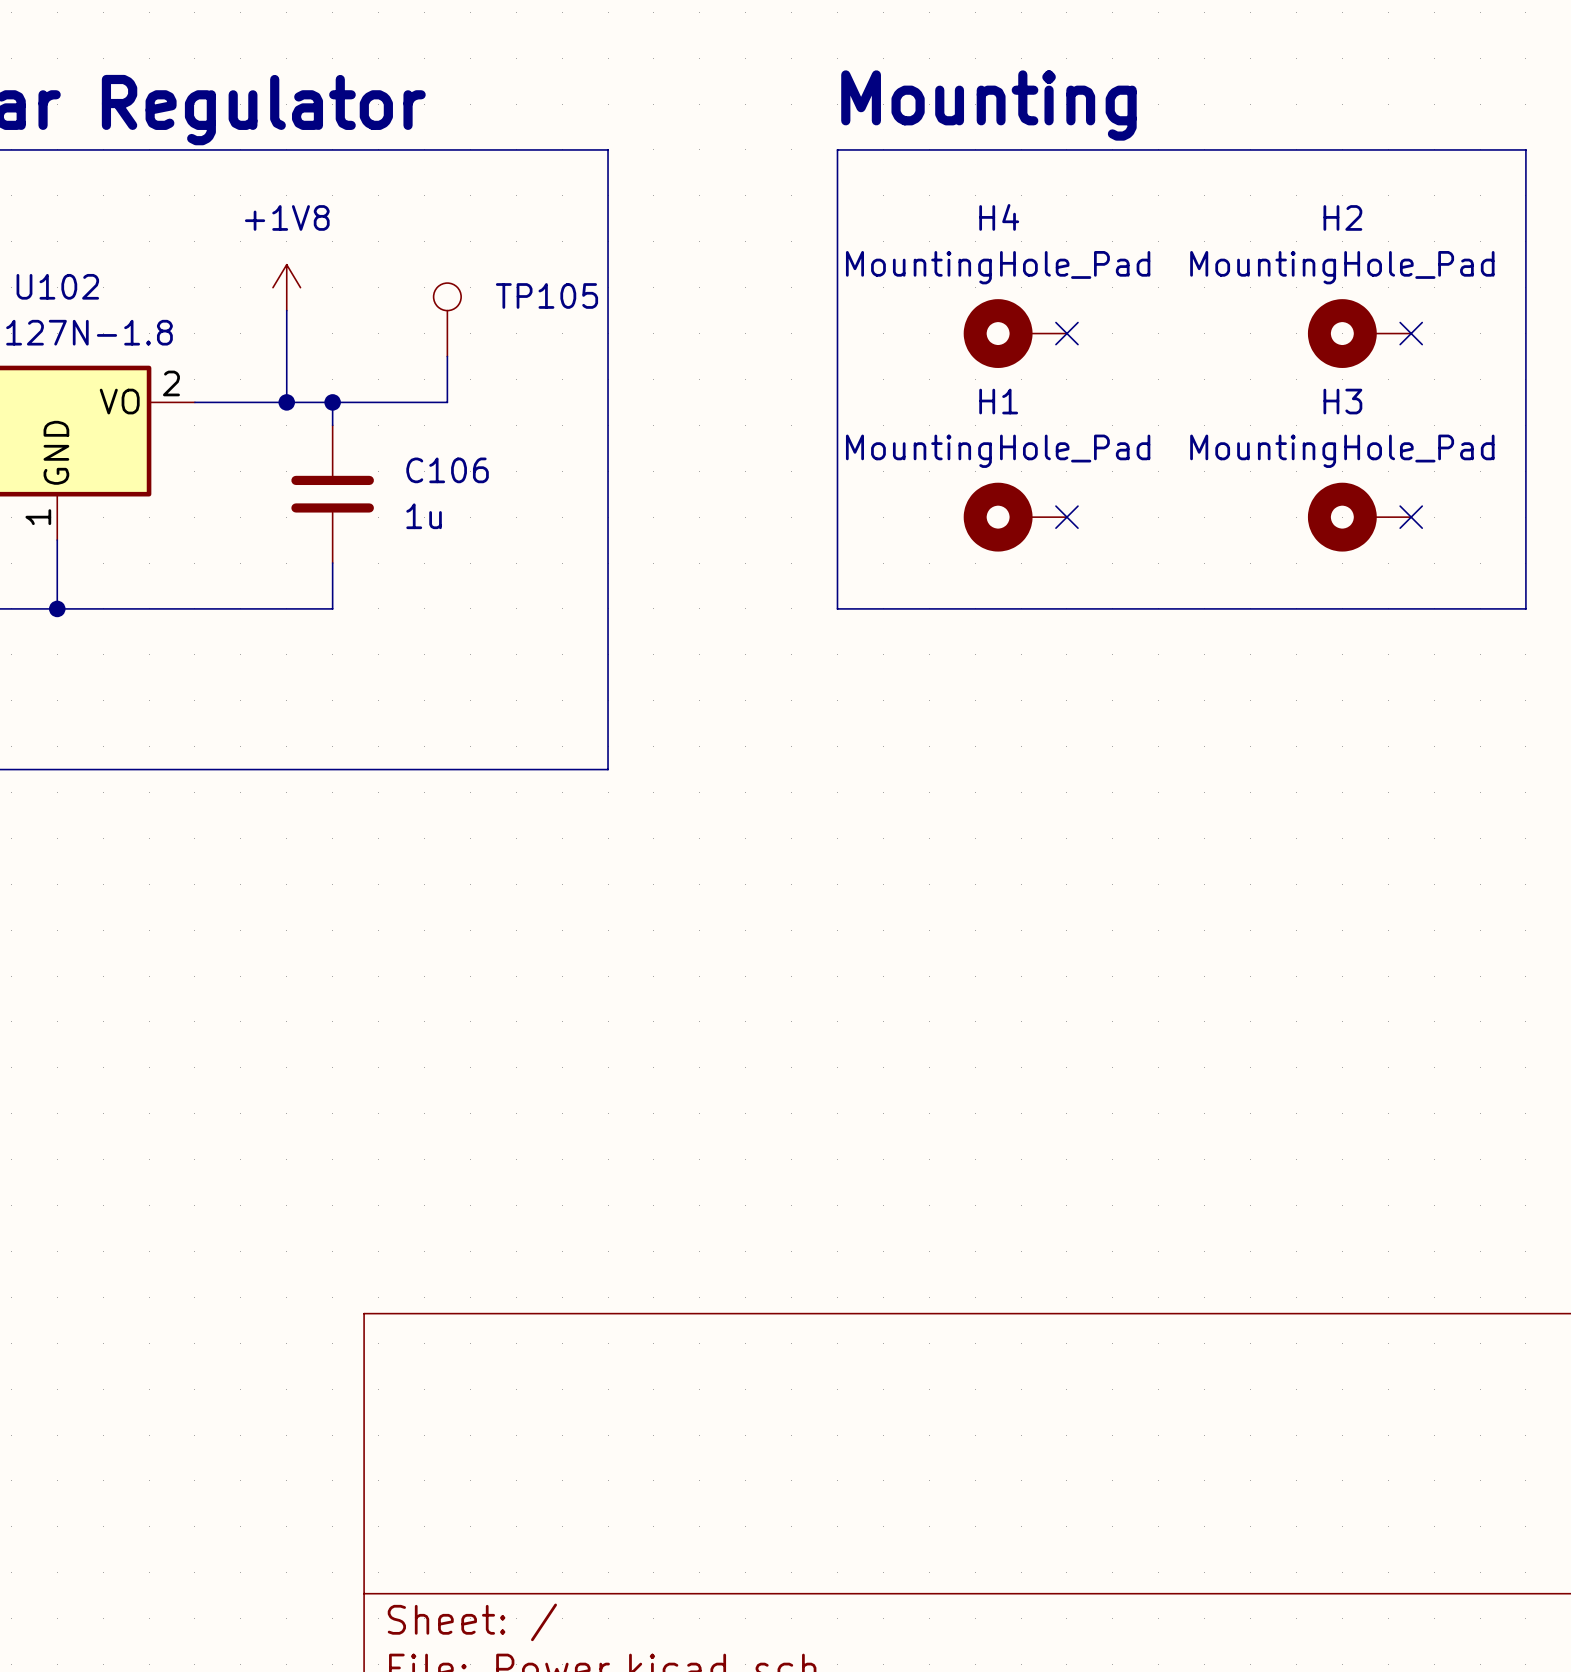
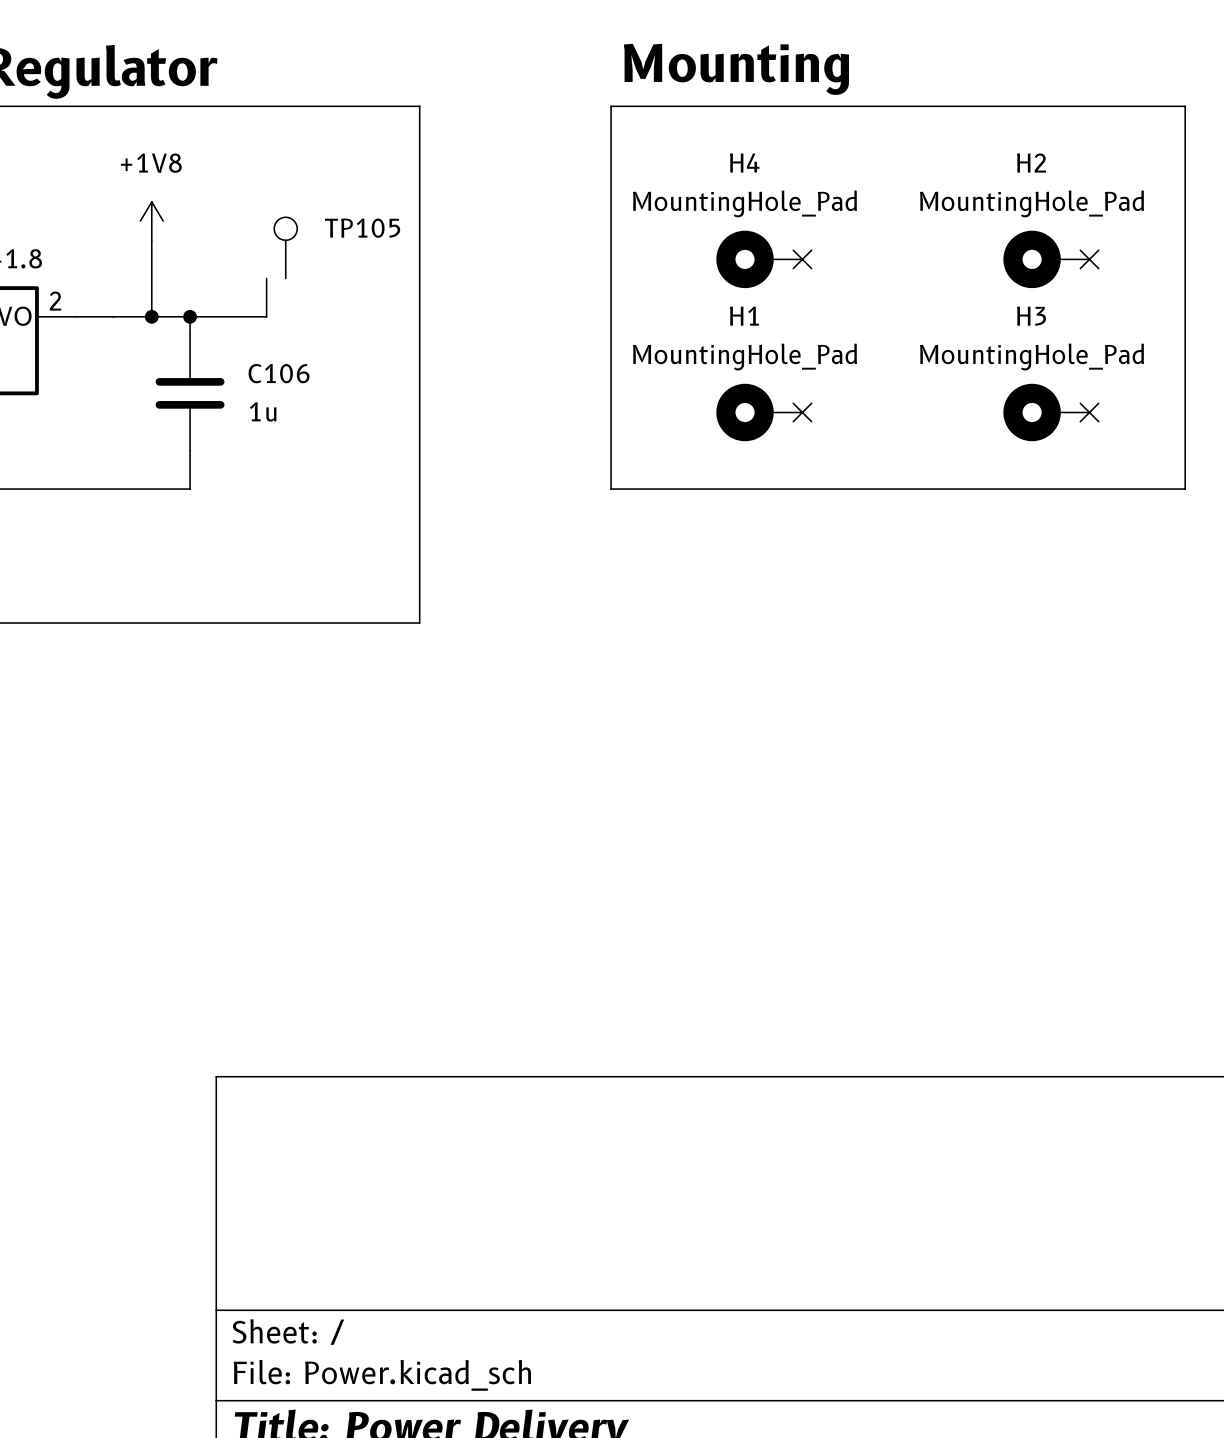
wire: (447, 356) (447, 402) (424, 402) -> (266, 278) (266, 316)

